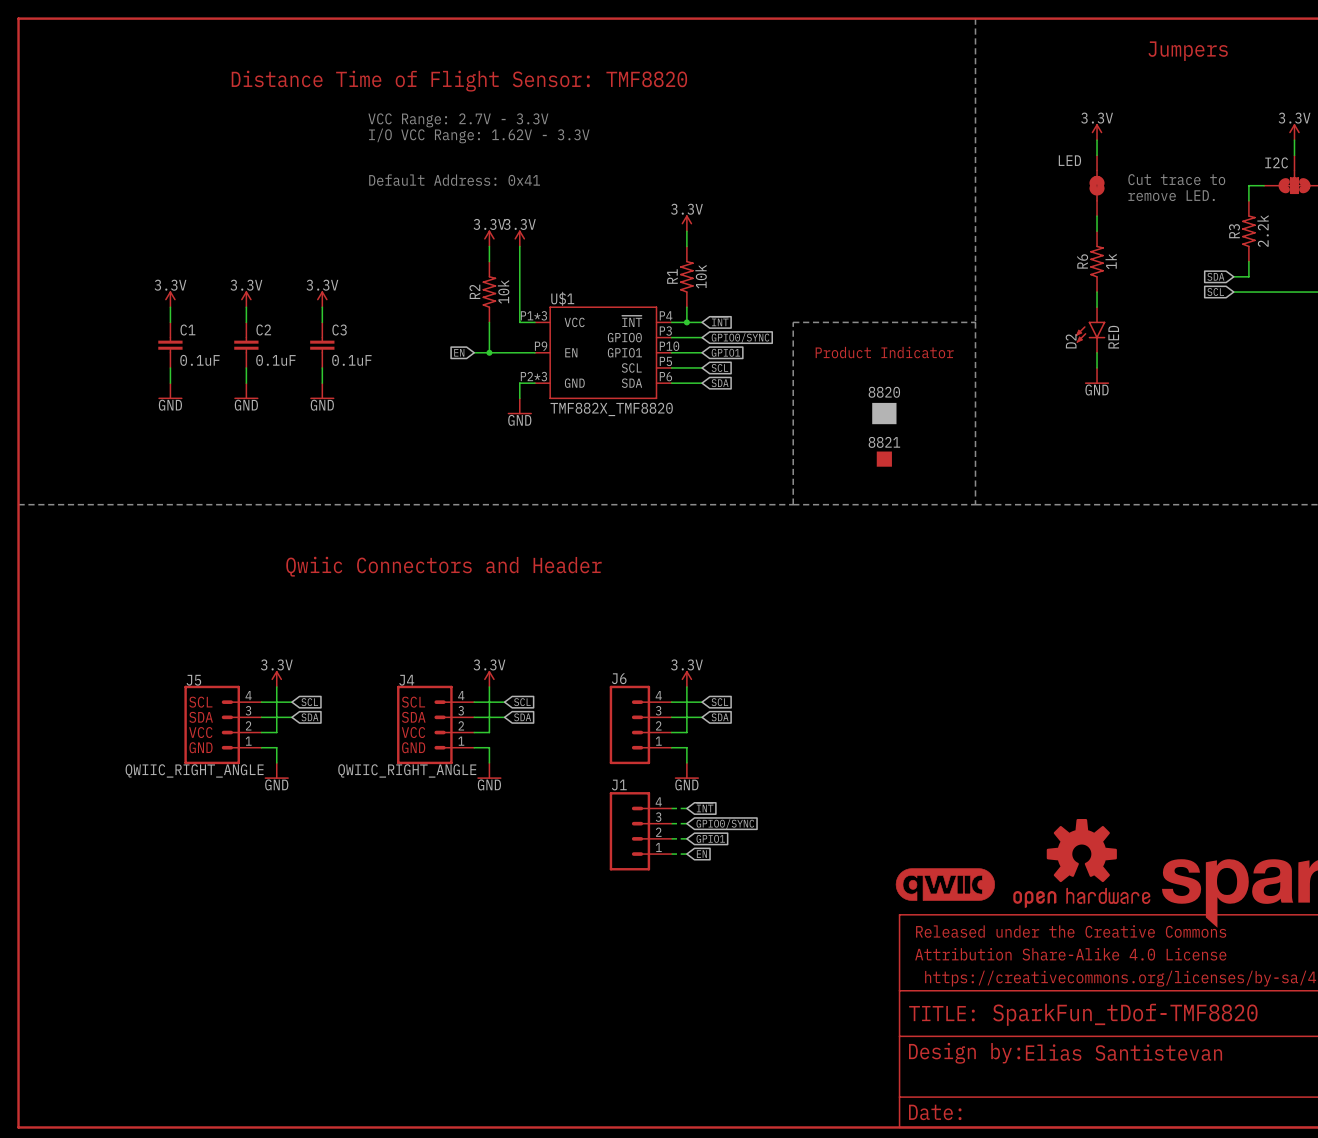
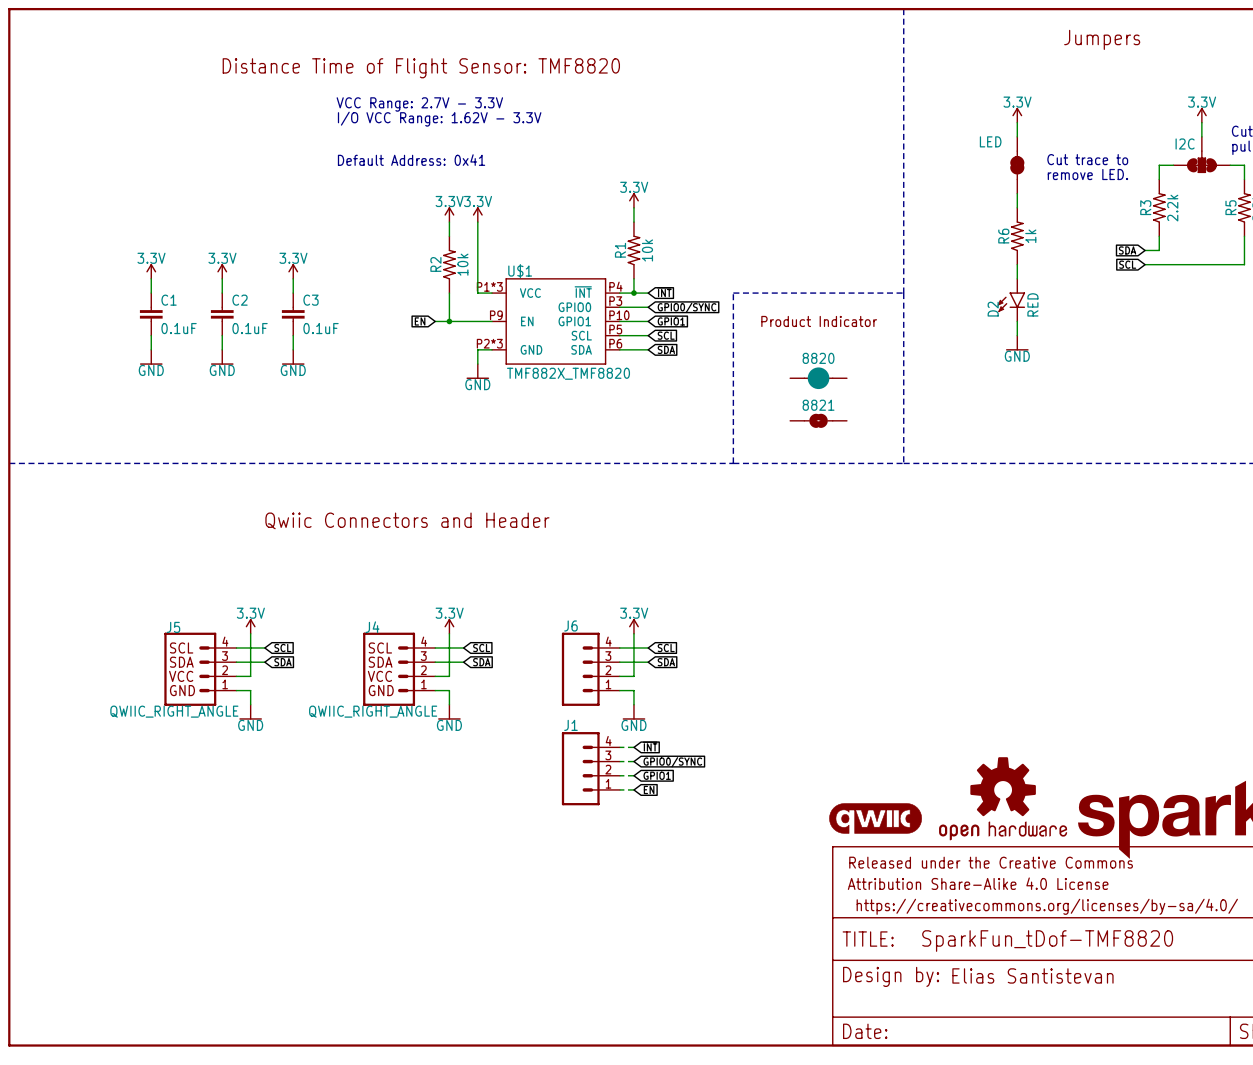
8820 symbol: [872, 402, 897, 425] -> [790, 367, 847, 390]
8821 symbol: [876, 451, 892, 467] -> [790, 413, 847, 428]

